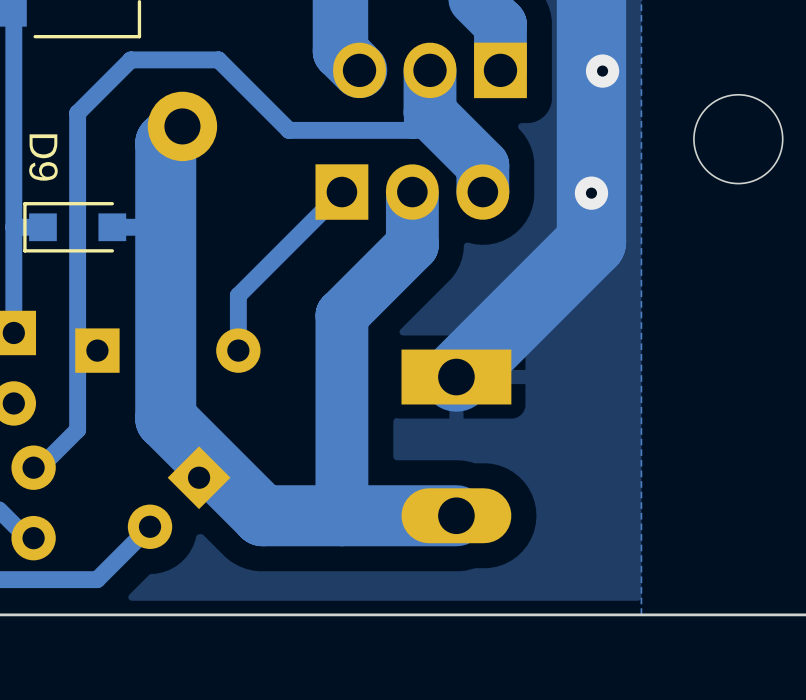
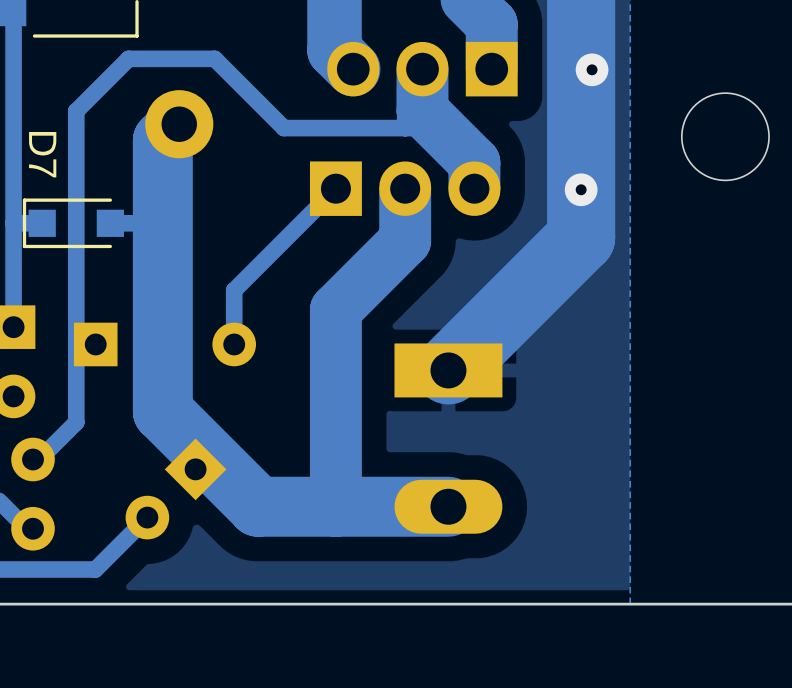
D9 name: D9 (43, 157) -> D7 (42, 154)

